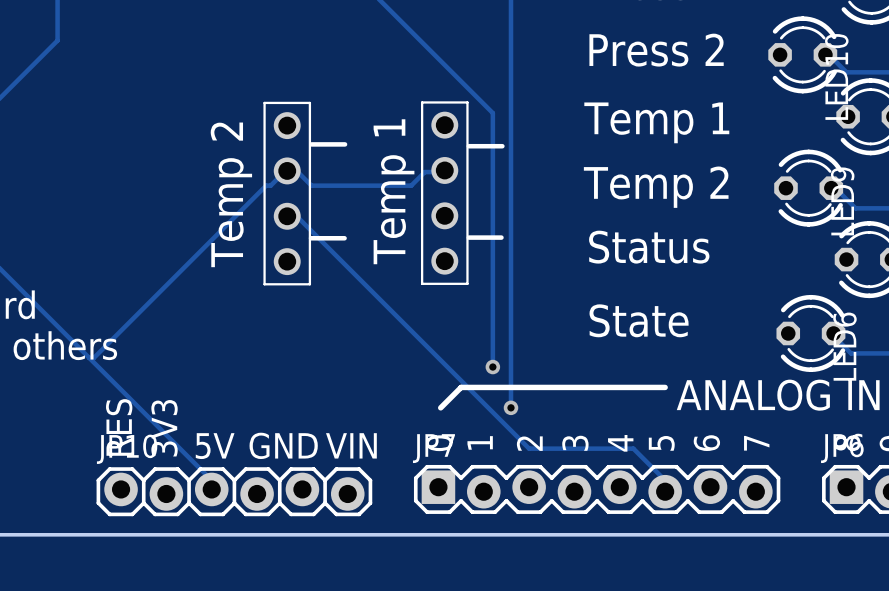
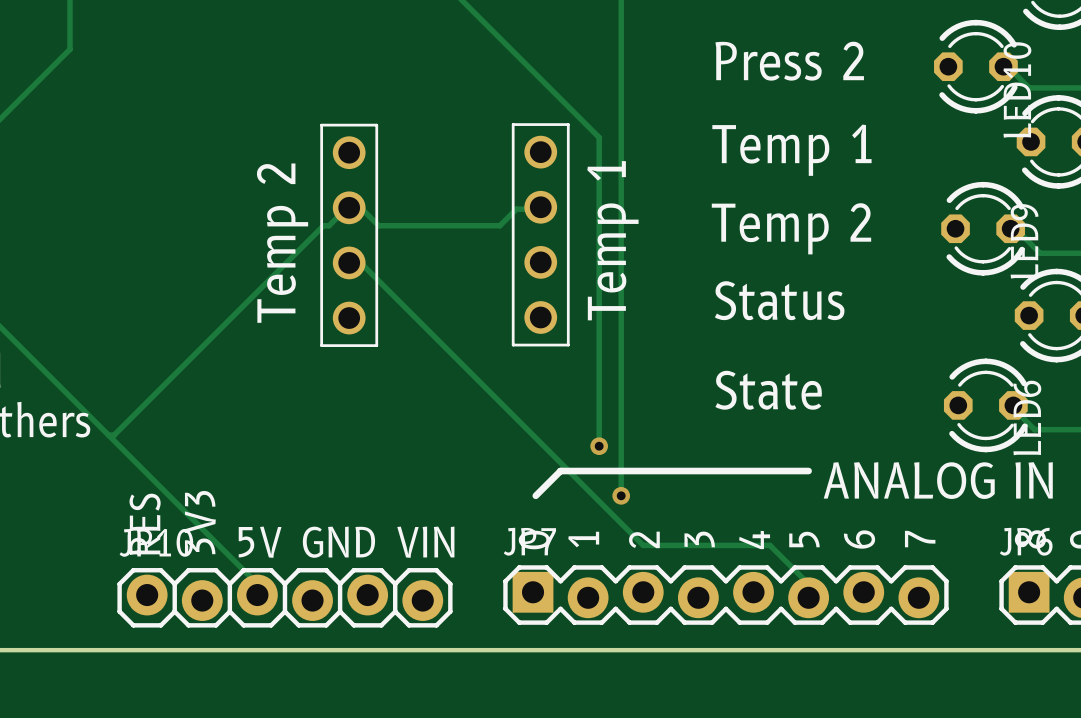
line: (311, 144) (345, 144) -> none
line: (468, 146) (502, 146) -> none
text position: Temp 1 (394, 191) -> Temp 1 (612, 240)
line: (468, 237) (501, 237) -> none
line: (311, 238) (344, 238) -> none

